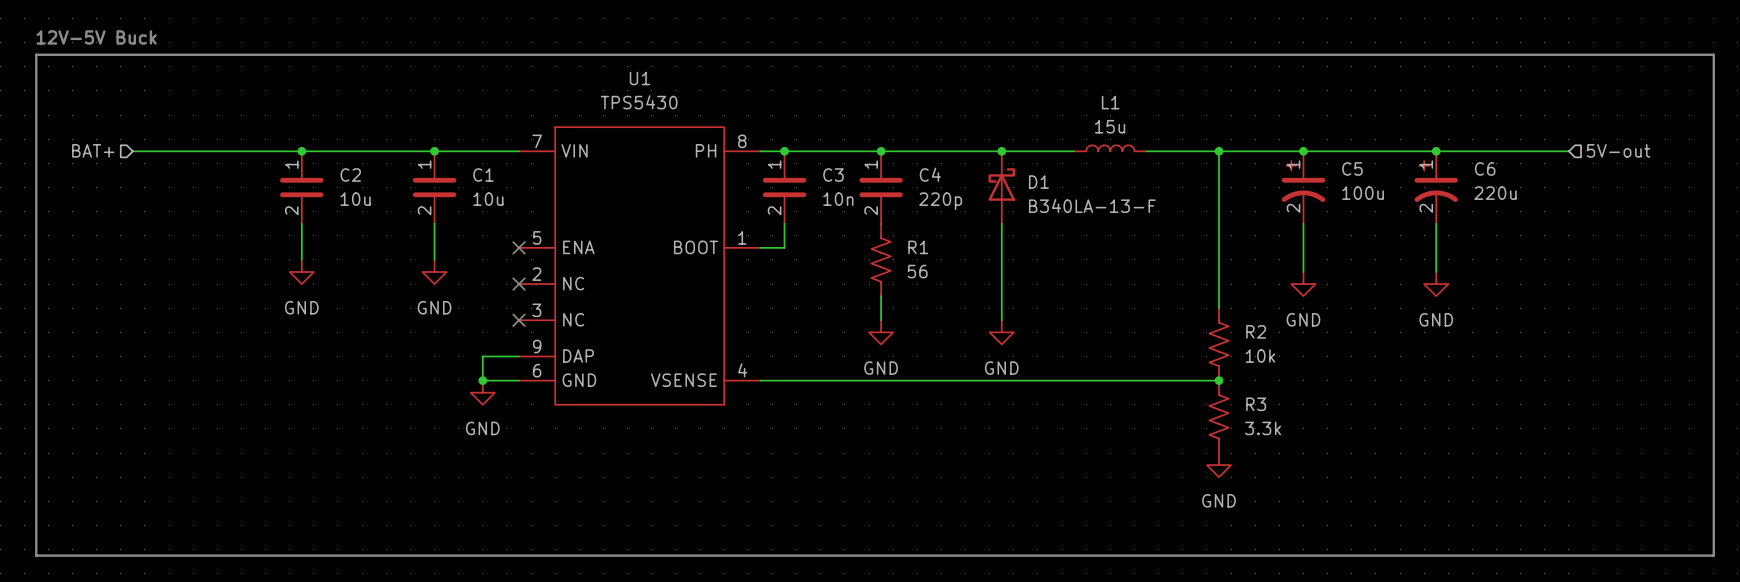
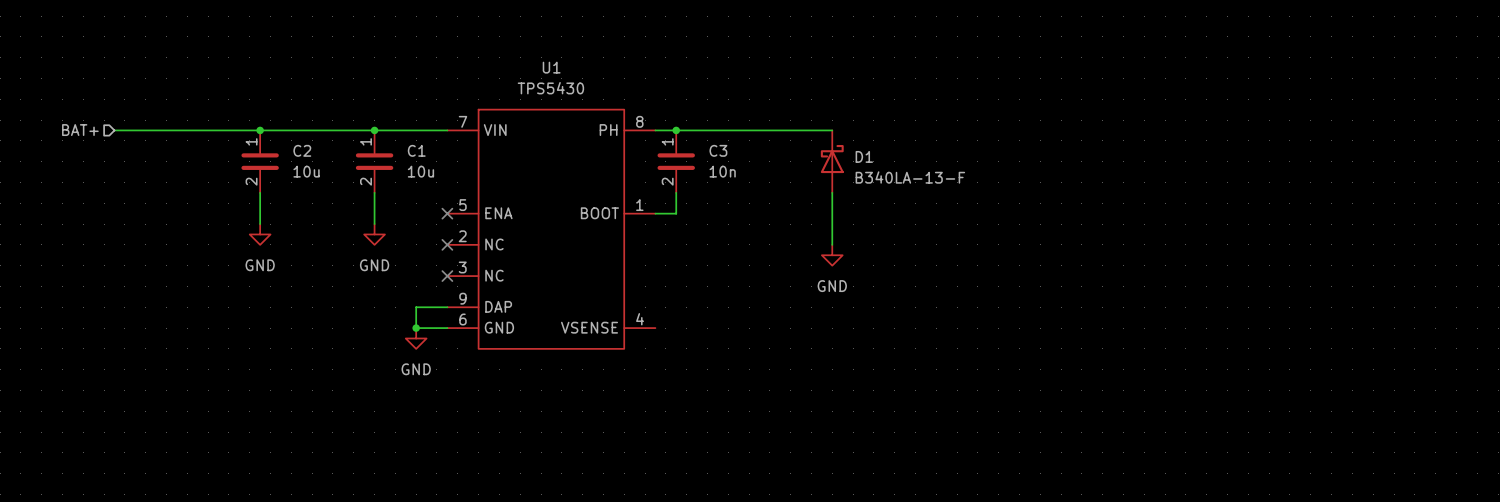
text: 12V-5V Buck (96, 37) -> none
line: (36, 54) (1713, 54) (1713, 555) (36, 555) (36, 54) -> none
L1: 15u (1110, 148) -> none
hierarchical label: 5V-out (1618, 150) -> none
junction: (881, 151) -> none
wire: (965, 151) (1074, 151) -> none
junction: (1001, 151) -> none
wire: (1146, 151) (1568, 151) -> none
wire: (1218, 151) (1218, 308) -> none
junction: (1218, 151) -> none
junction: (1303, 151) -> none
junction: (1436, 151) -> none
C4: 220p (881, 187) -> none
D1 position: (1001, 187) -> (832, 161)
C5: 100u (1303, 187) -> none
C6: 220u (1436, 187) -> none
wire: none -> (832, 192) (832, 244)
wire: (1001, 223) (1001, 320) -> none
wire: (1303, 223) (1303, 272) -> none
wire: (1436, 223) (1436, 272) -> none
R1: 56 (881, 259) -> none
power symbol: GND (1303, 284) -> none
power symbol: GND (1436, 284) -> none
wire: (881, 296) (881, 320) -> none
power symbol: none -> GND (832, 255)
power symbol: GND (881, 332) -> none
power symbol: GND (1001, 332) -> none
R2: 10k (1218, 344) -> none
wire: (760, 380) (1218, 380) -> none
junction: (1218, 380) -> none
R3: 3.3k (1218, 416) -> none
power symbol: GND (1218, 465) -> none

